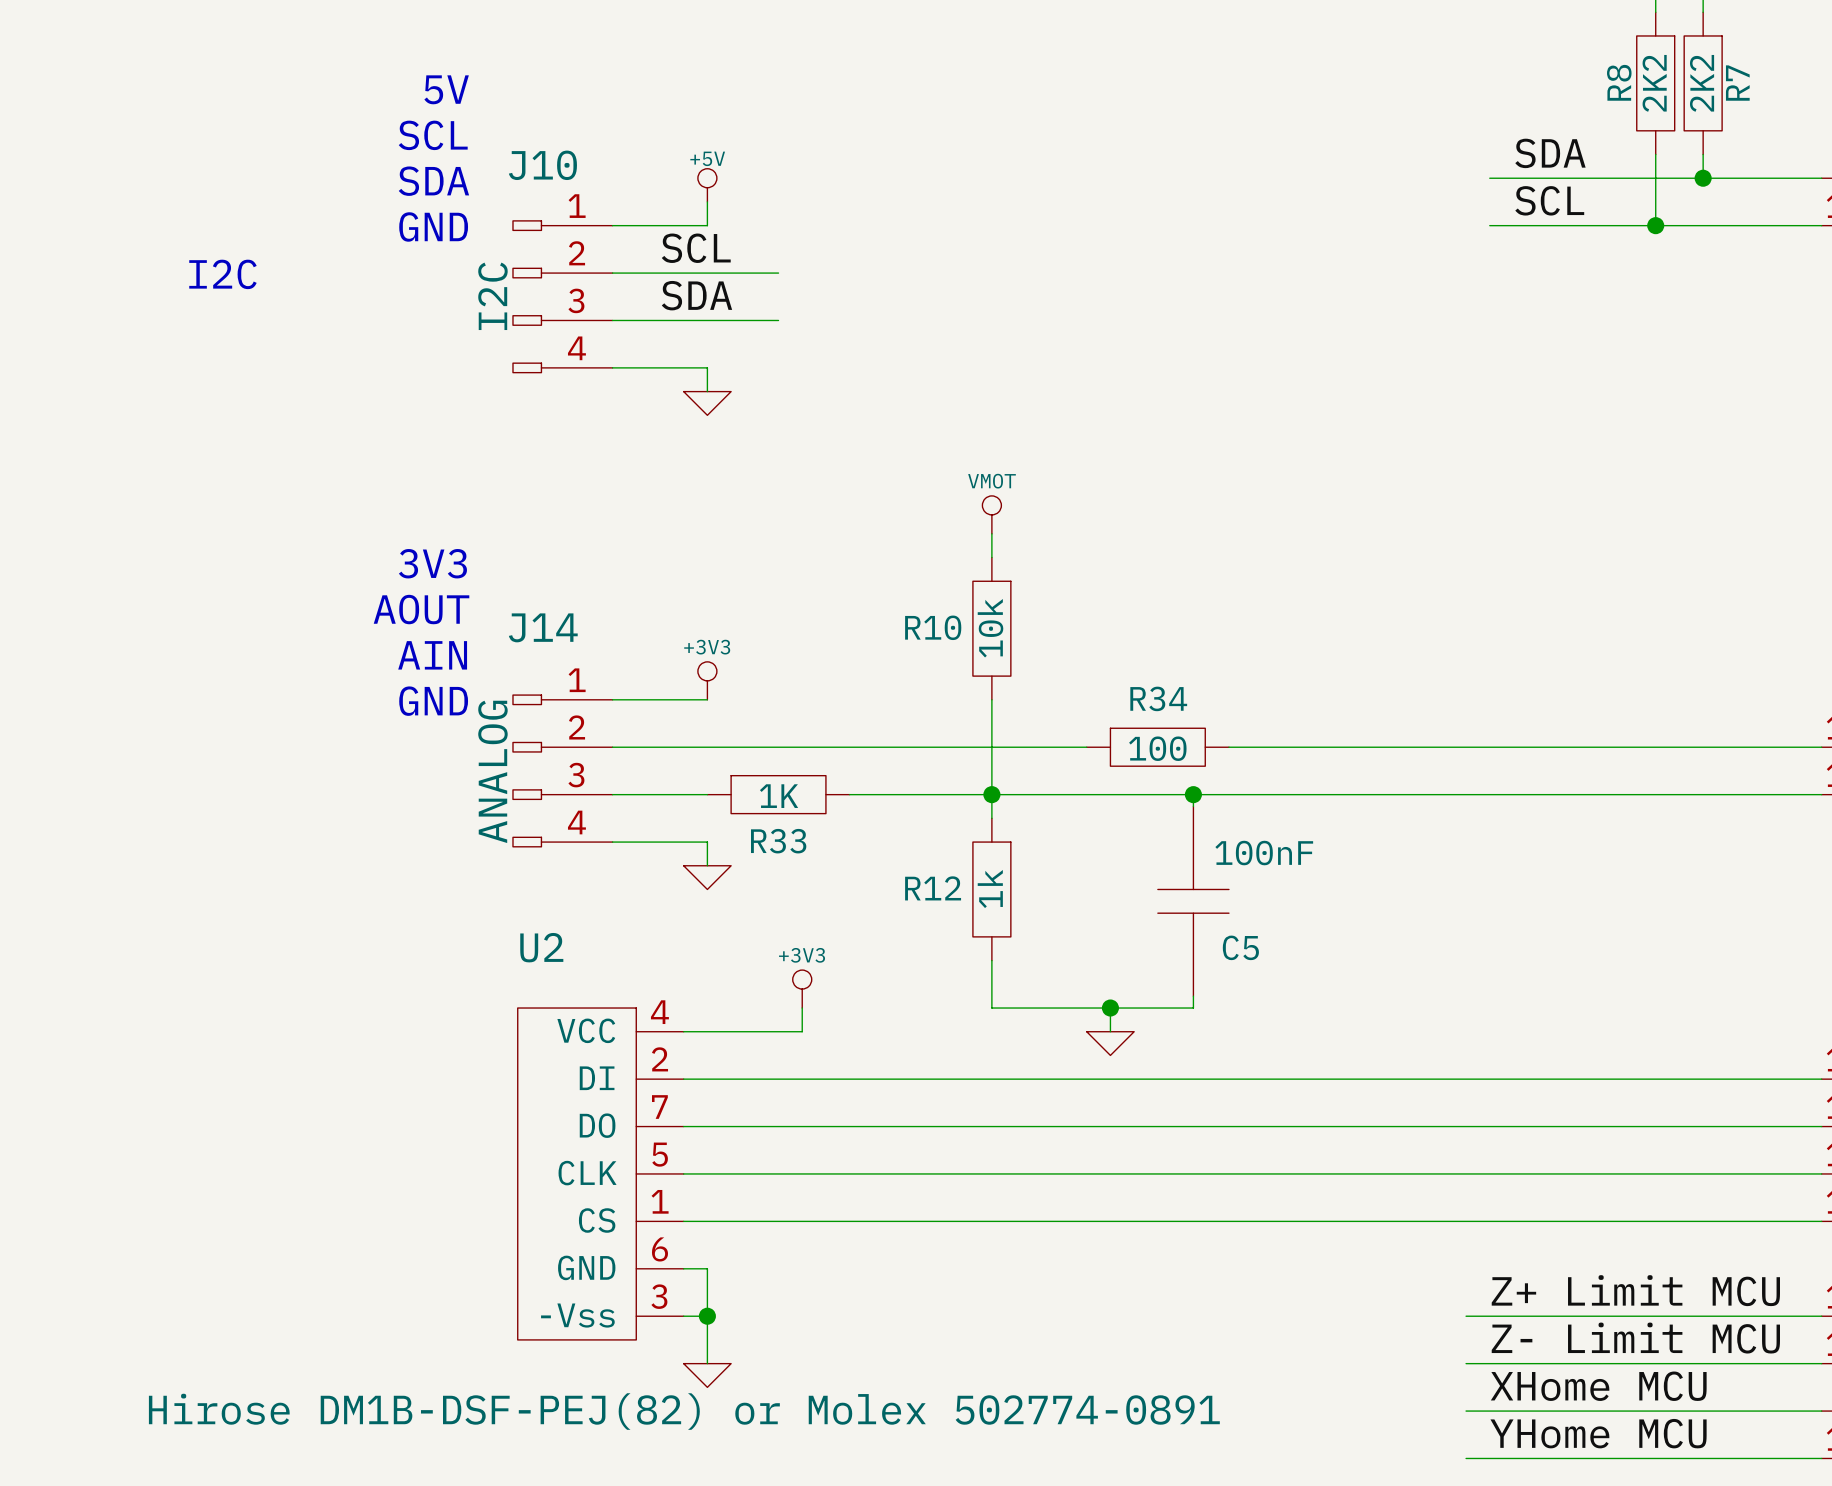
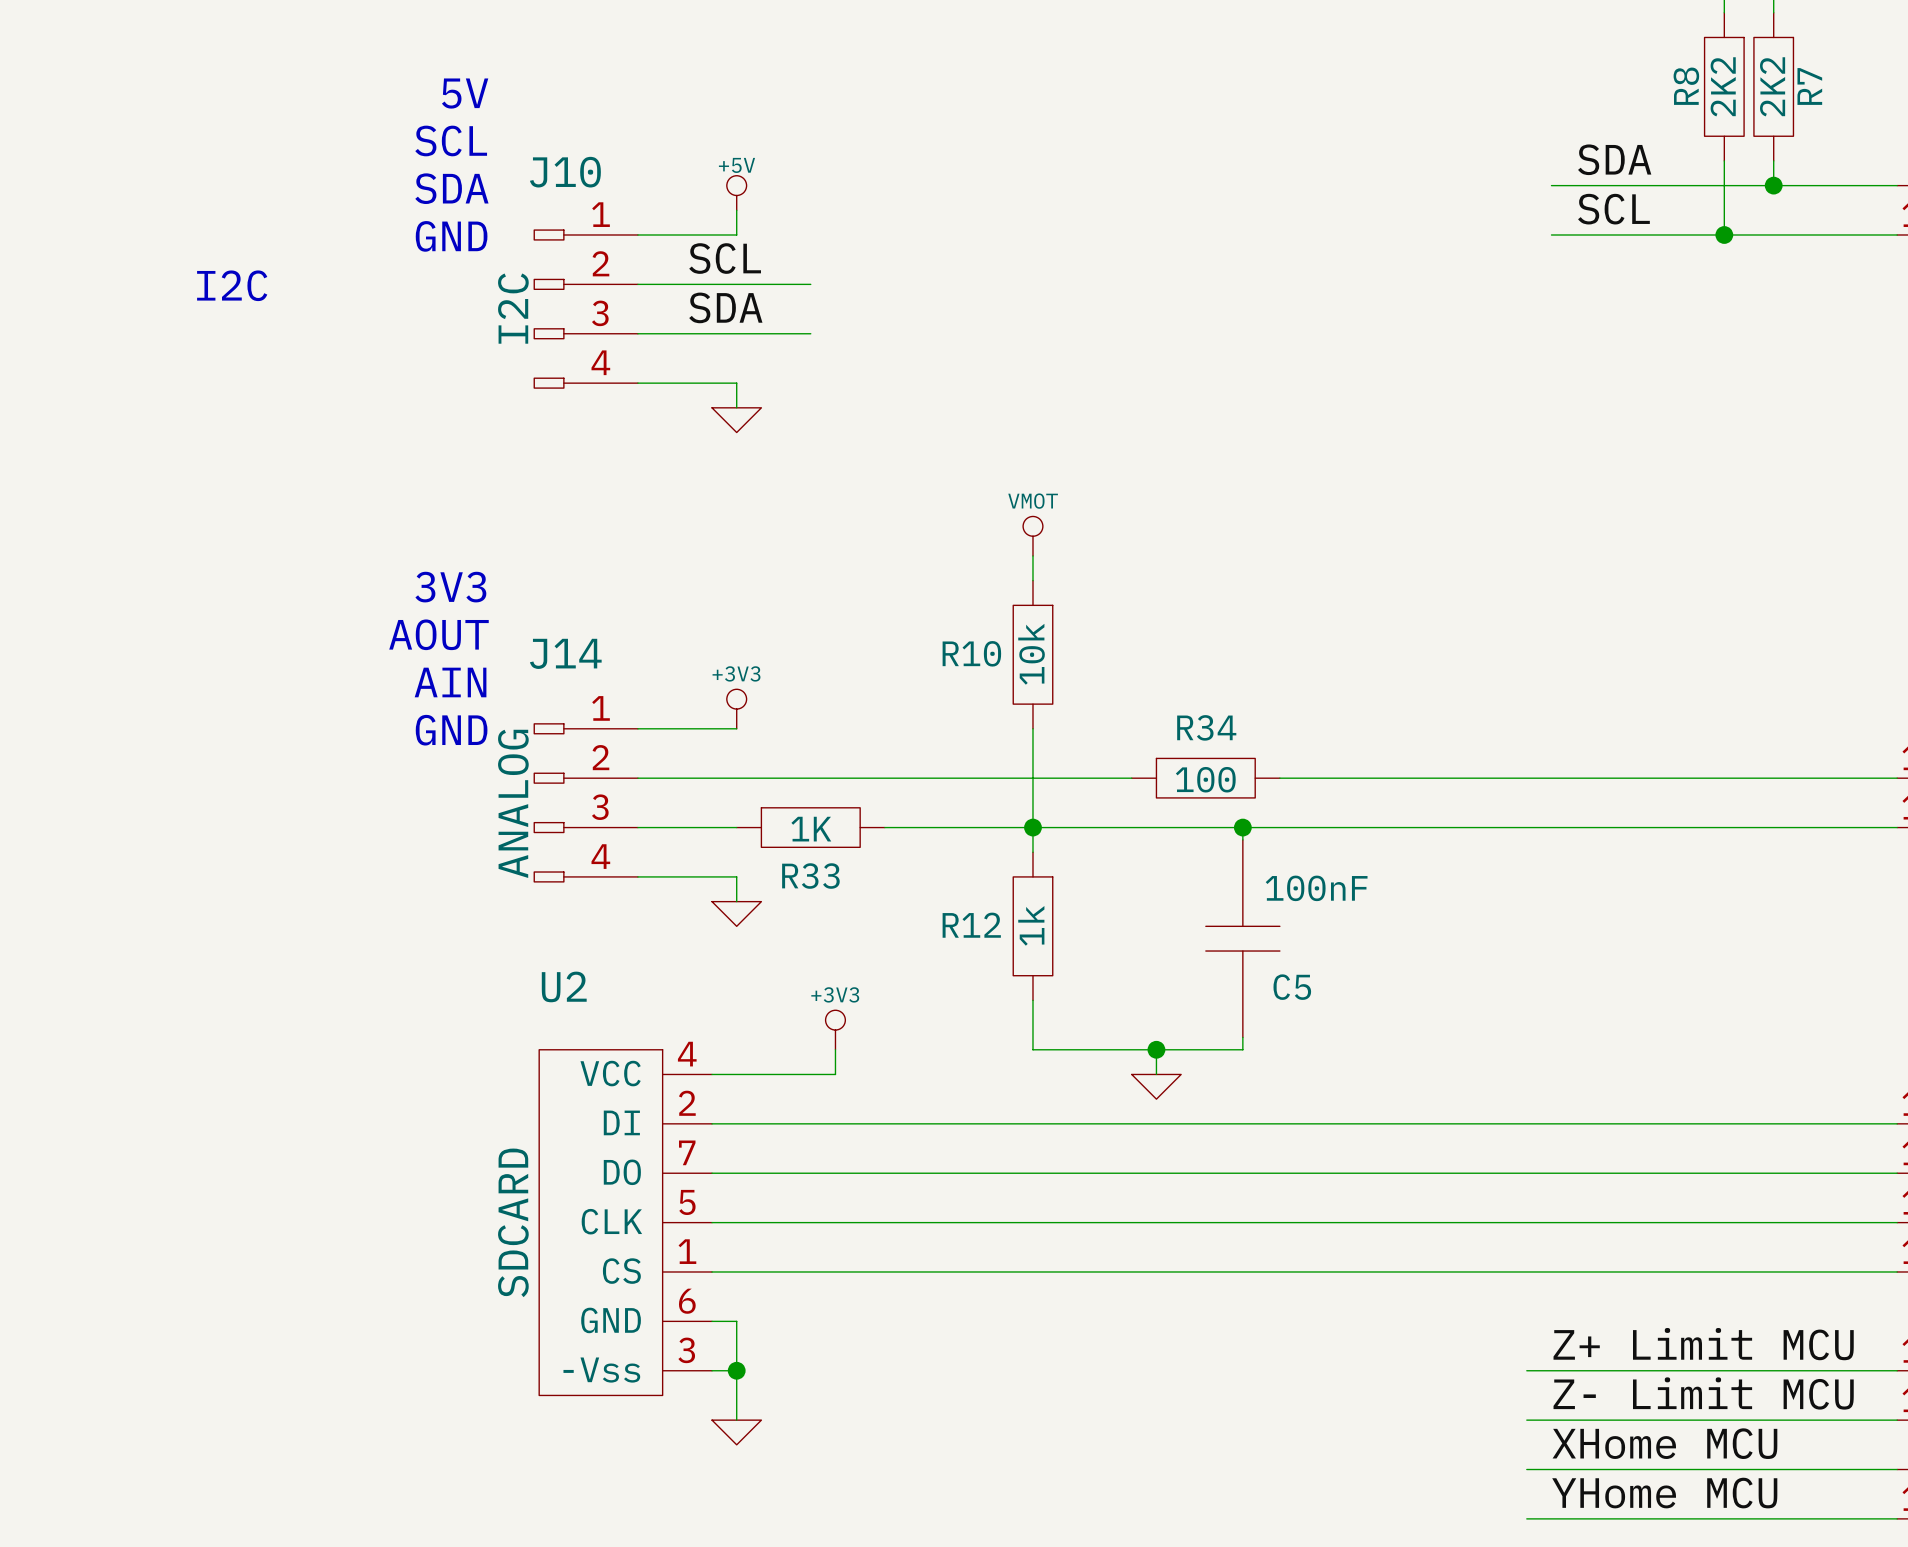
U2 value: Hirose DM1B-DSF-PEJ(82) or Molex 502774-0891 (684, 1411) -> SDCARD (513, 1222)

